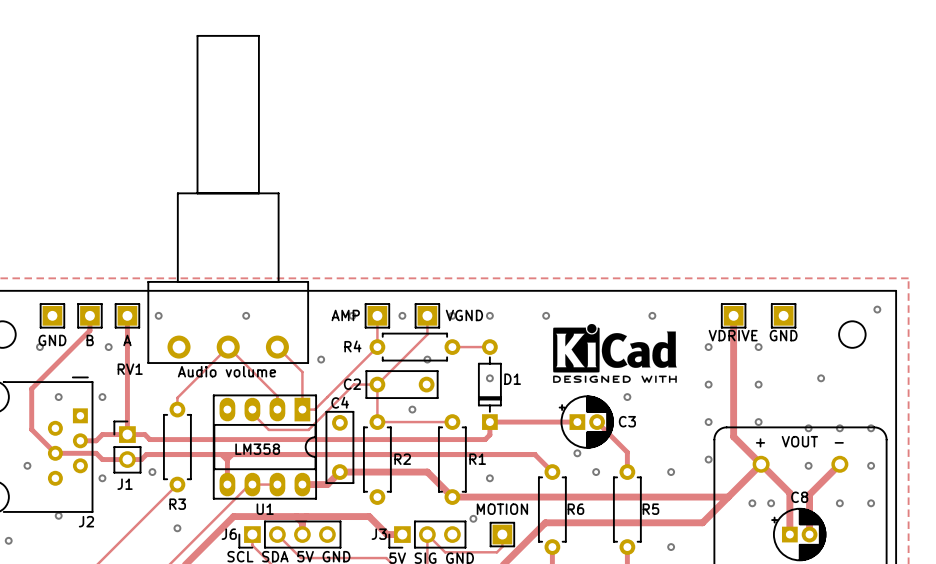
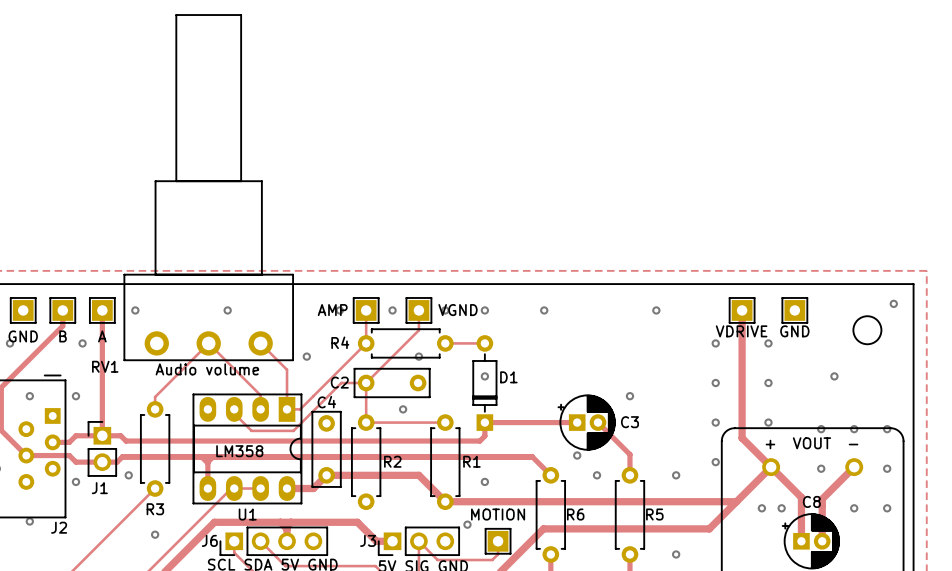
drawing: [553, 323, 677, 383] -> none

